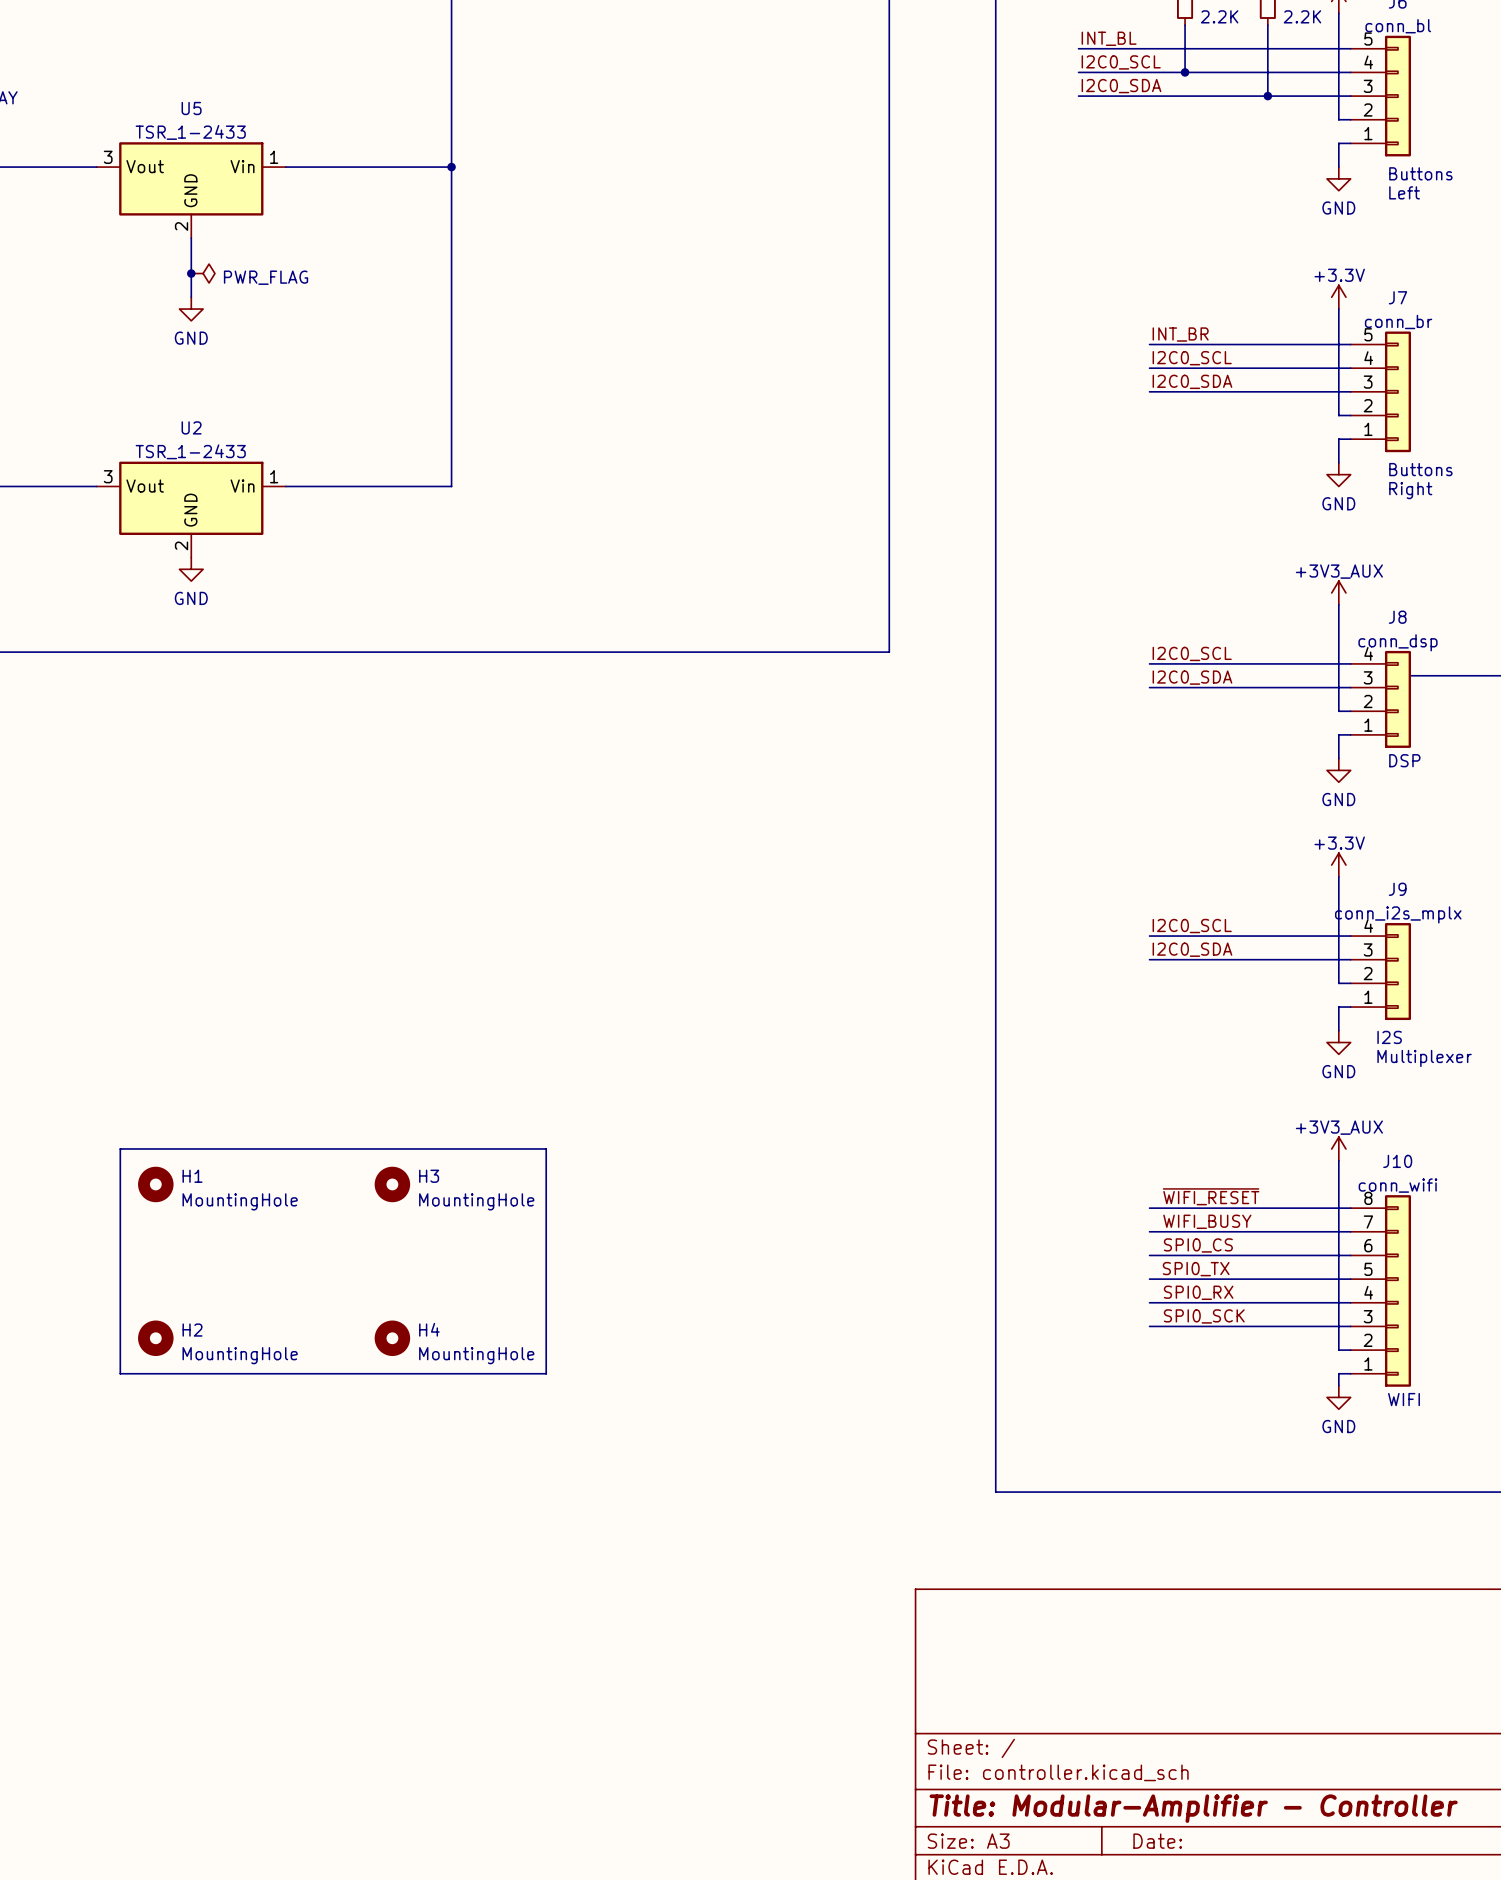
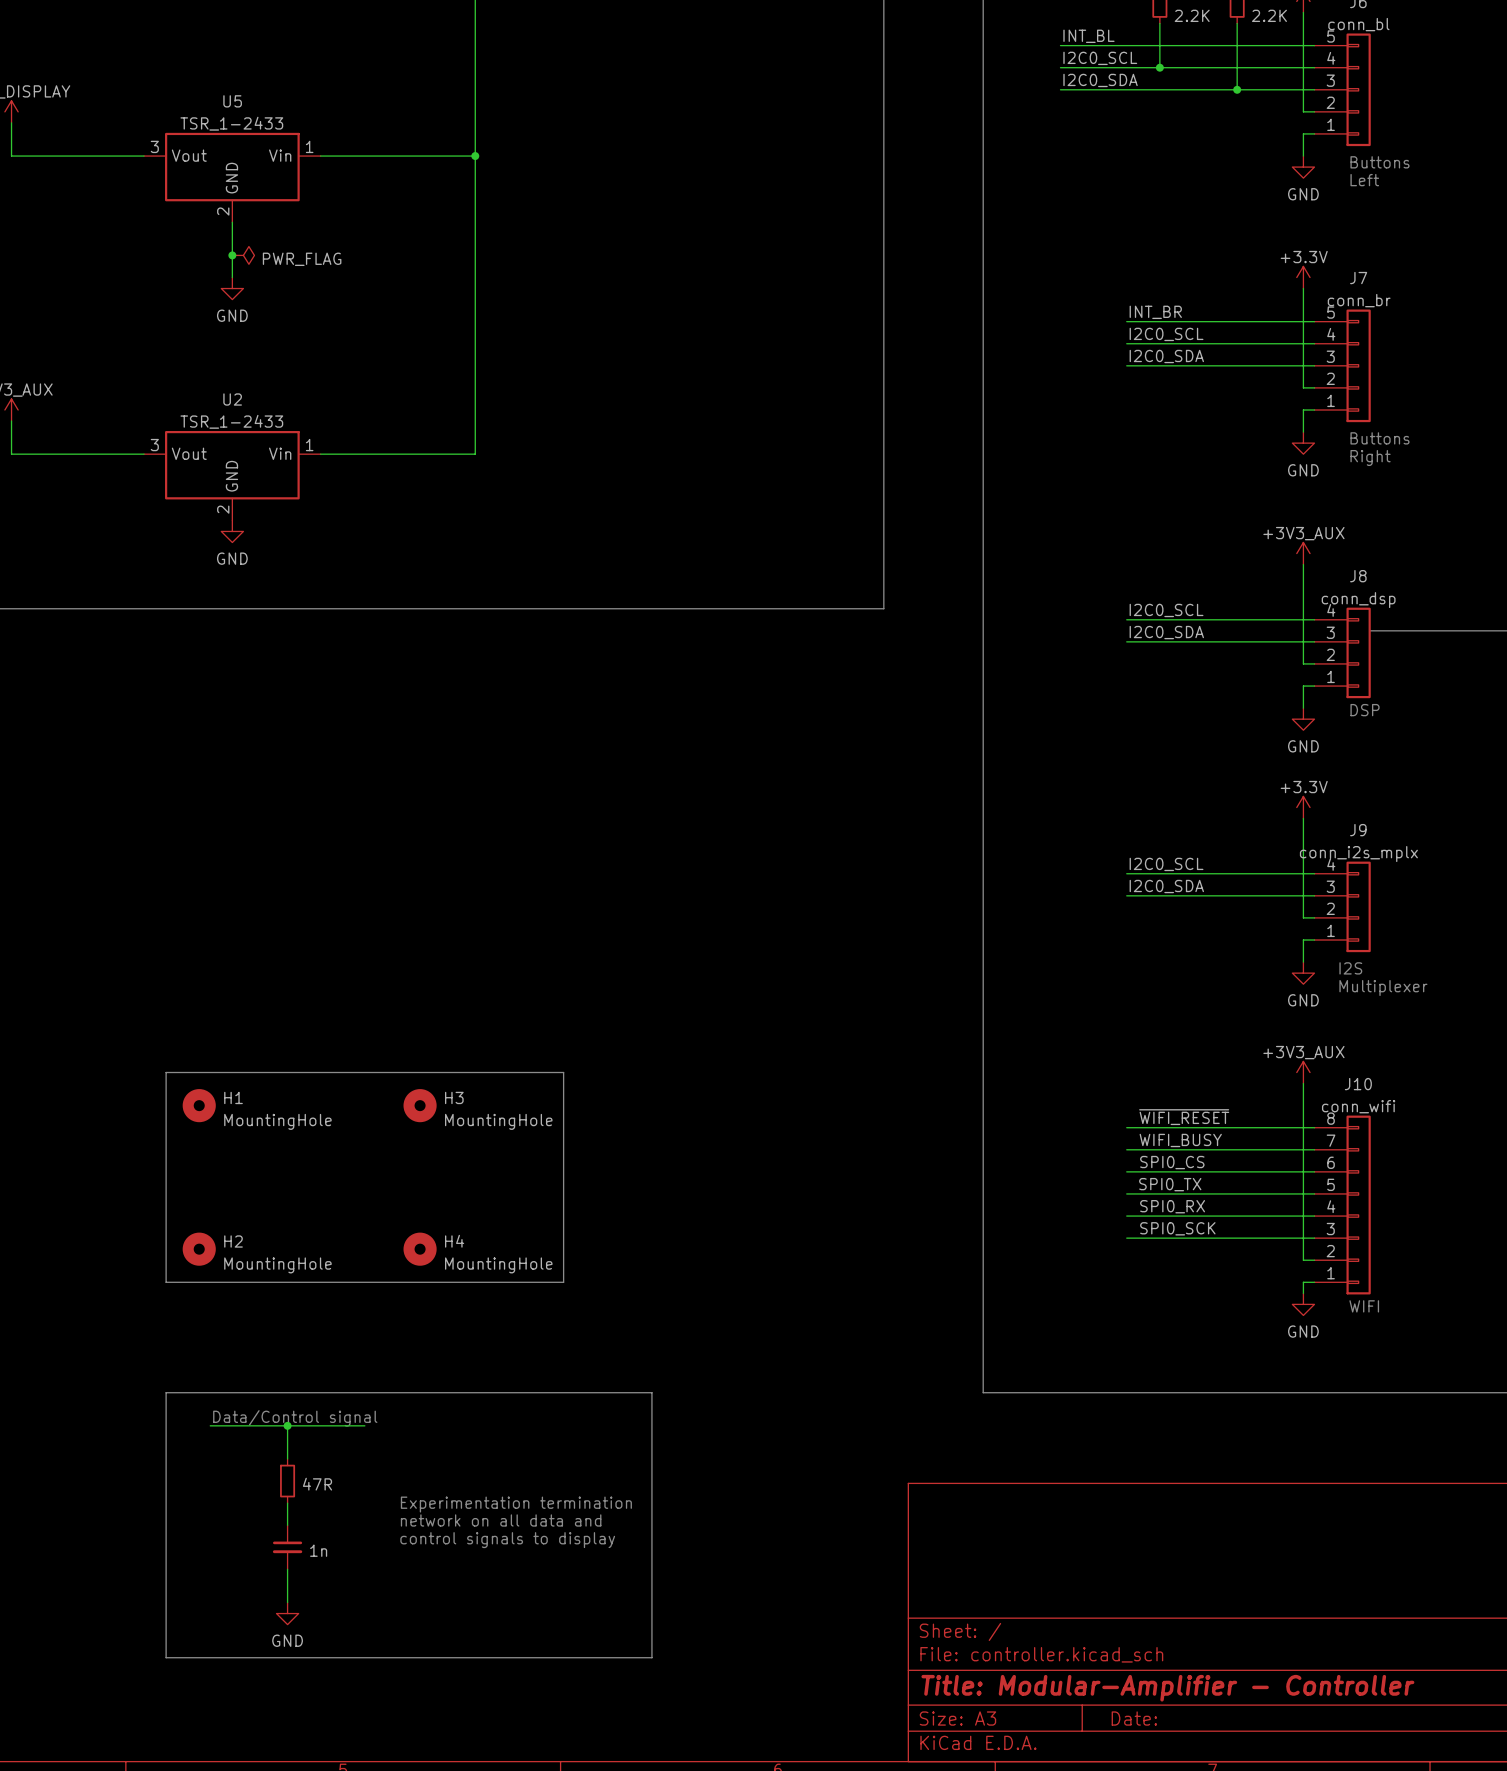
line: none -> (166, 1392) (651, 1392) (651, 1657) (166, 1657) (166, 1392)
text: none -> Data/Control signal (295, 1418)
wire: none -> (210, 1425) (364, 1425)
wire: none -> (287, 1425) (287, 1458)
junction: none -> (287, 1425)
power symbol: none -> 47R (287, 1481)
wire: none -> (287, 1503) (287, 1525)
text: none -> Experimentation termination (516, 1504)
text: none -> network on all data and (501, 1520)
text: none -> control signals to display (507, 1540)
power symbol: none -> 1n (287, 1547)
wire: none -> (287, 1569) (287, 1602)
power symbol: none -> GND (287, 1613)

